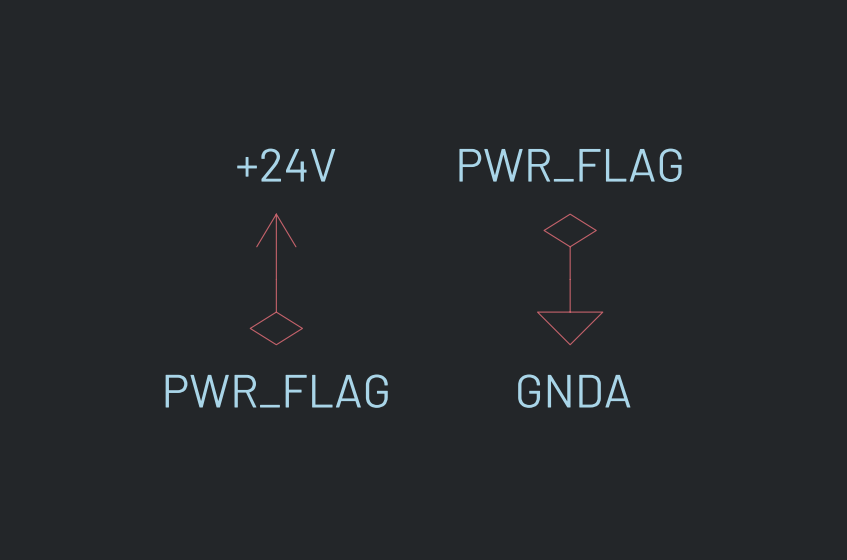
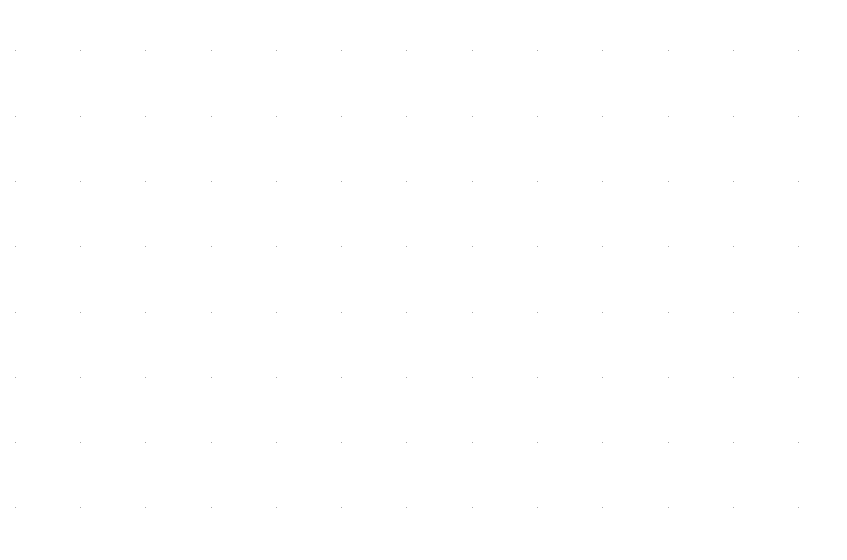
power symbol: +24V (276, 246) -> none
power symbol: PWR_FLAG (570, 246) -> none
power symbol: PWR_FLAG (276, 312) -> none
power symbol: GNDA (570, 312) -> none

